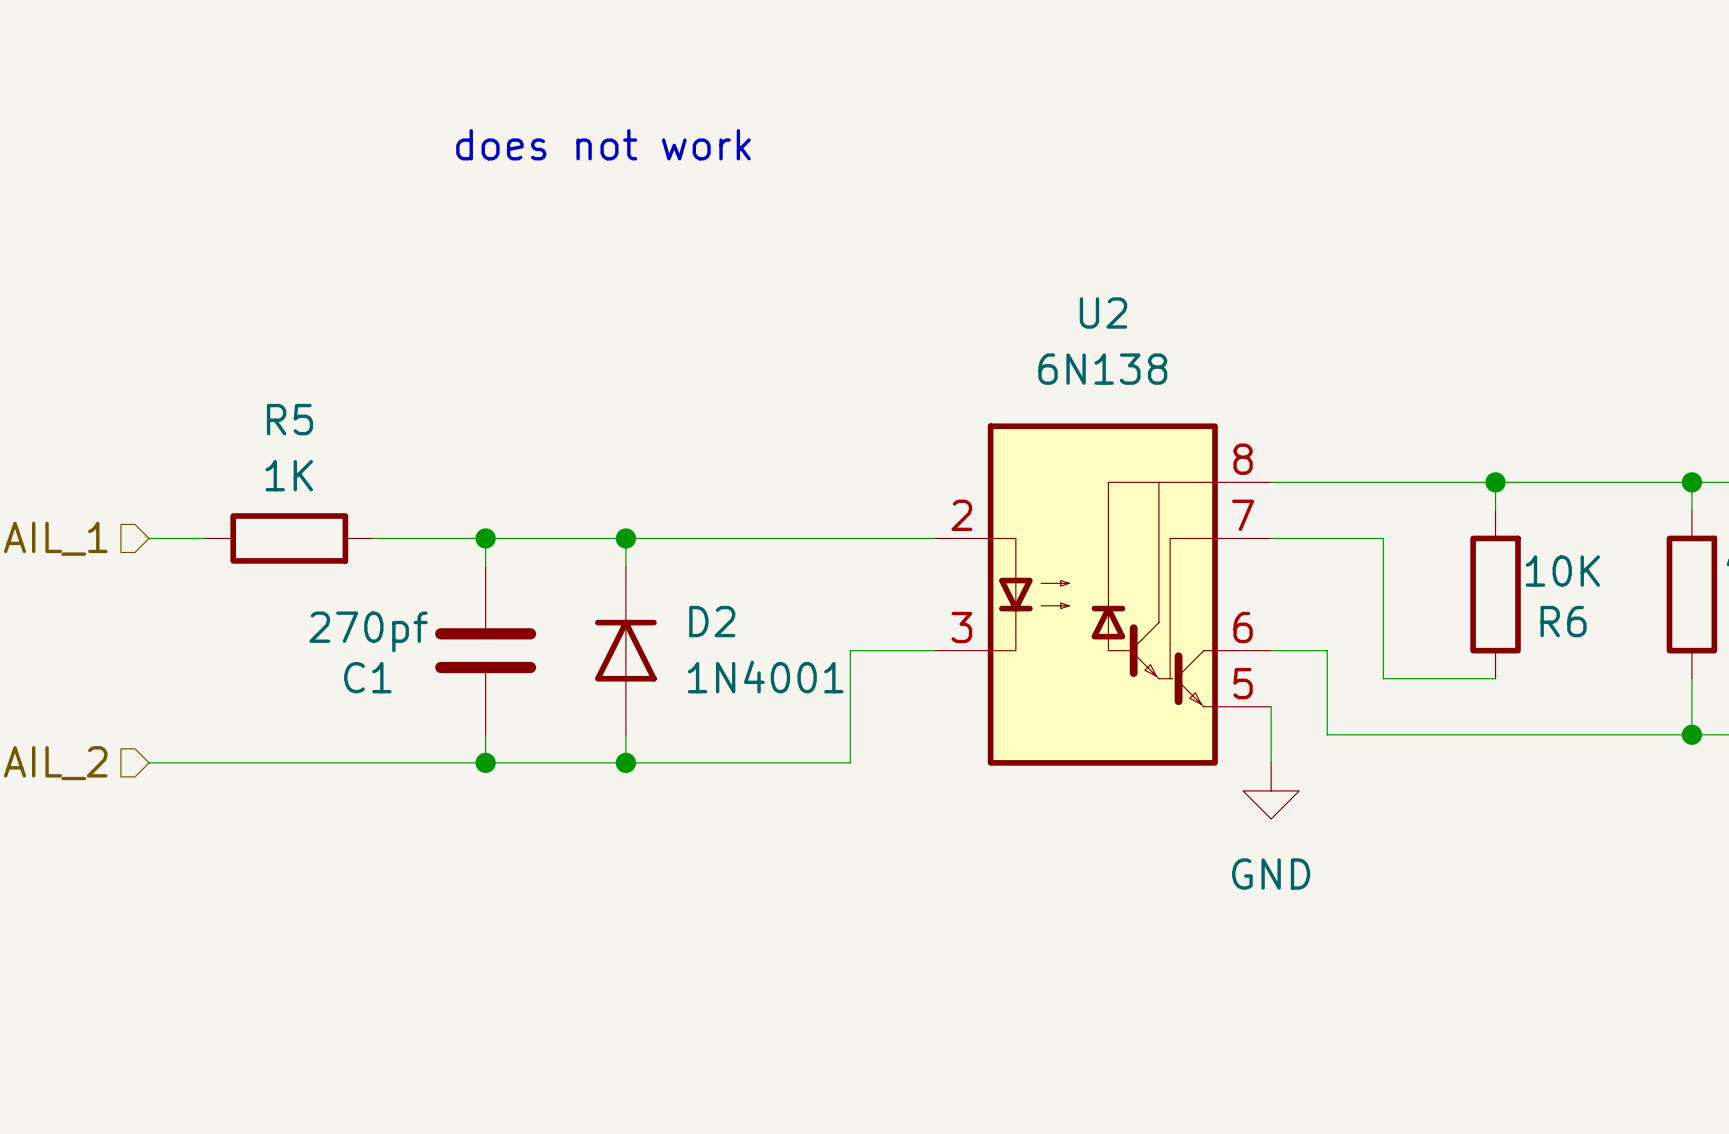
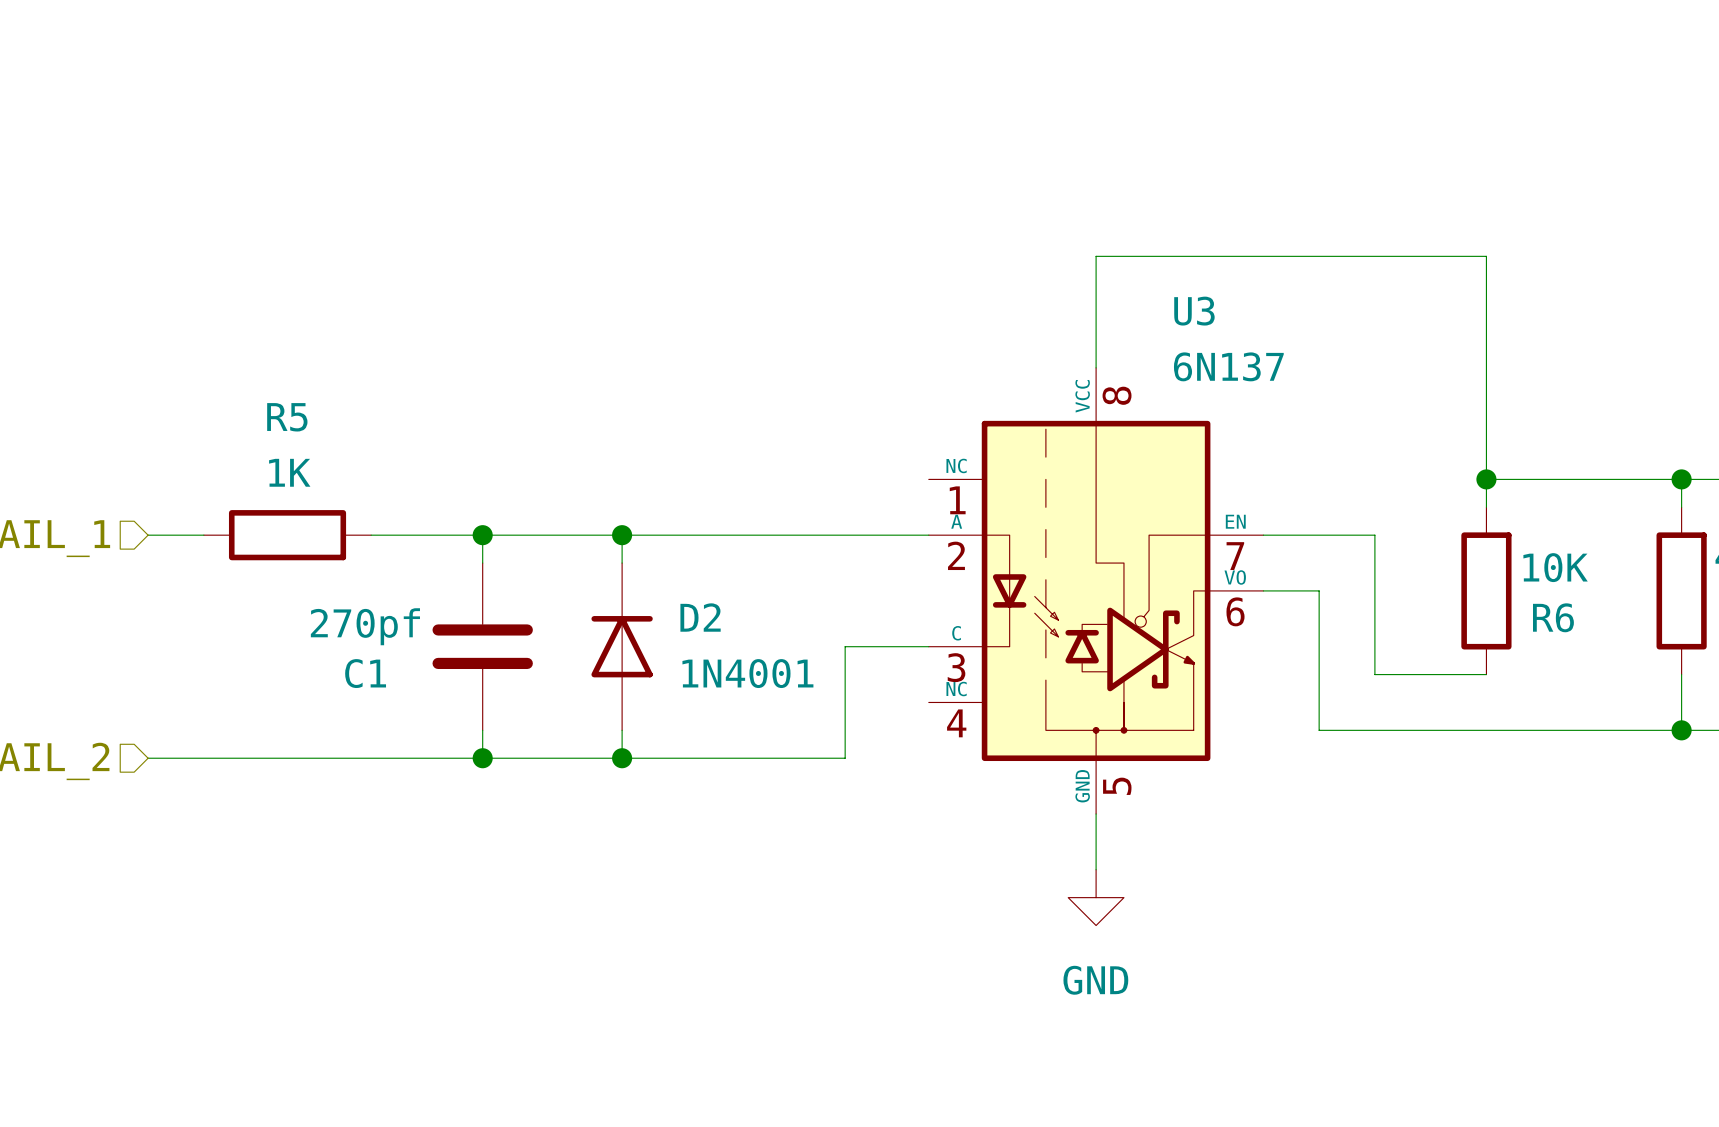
text: does not work (603, 144) -> none
wire: (1271, 482) (1495, 482) -> (1096, 367) (1096, 256) (1486, 256) (1486, 479)
U2: 6N138 (1102, 594) -> none
U3: none -> 6N137 (1096, 590)
wire: (1271, 650) (1327, 650) -> (1263, 590) (1319, 590) (1319, 646)
wire: (1271, 706) (1271, 762) -> (1096, 813) (1096, 869)
power symbol position: GND (1271, 790) -> GND (1096, 897)

